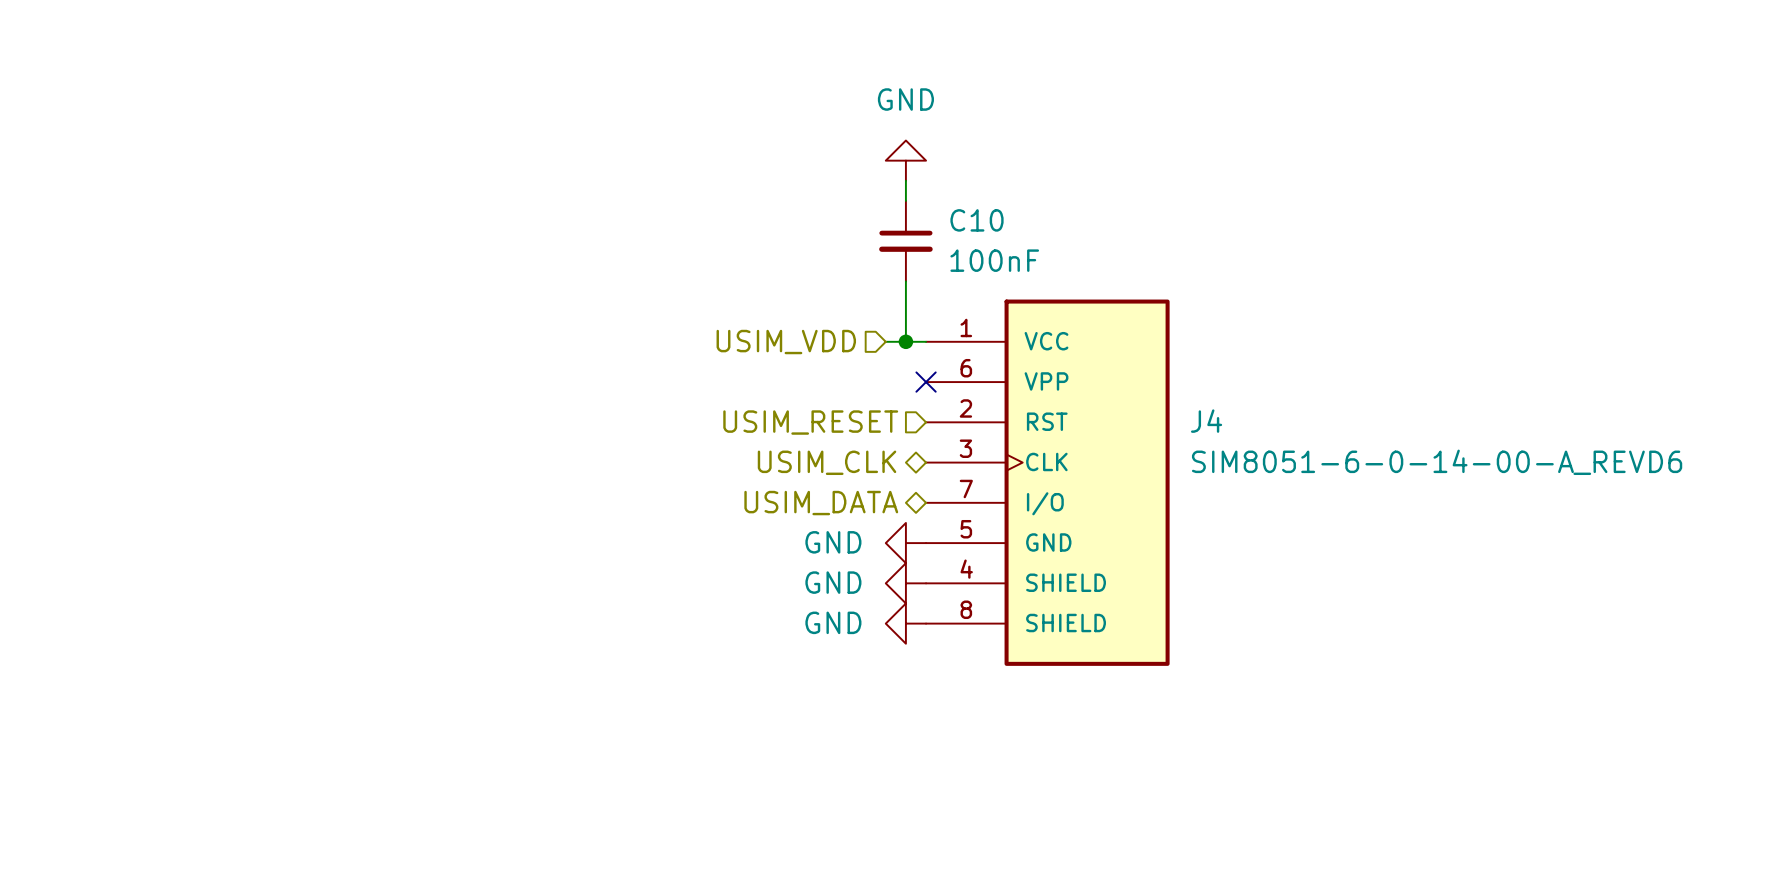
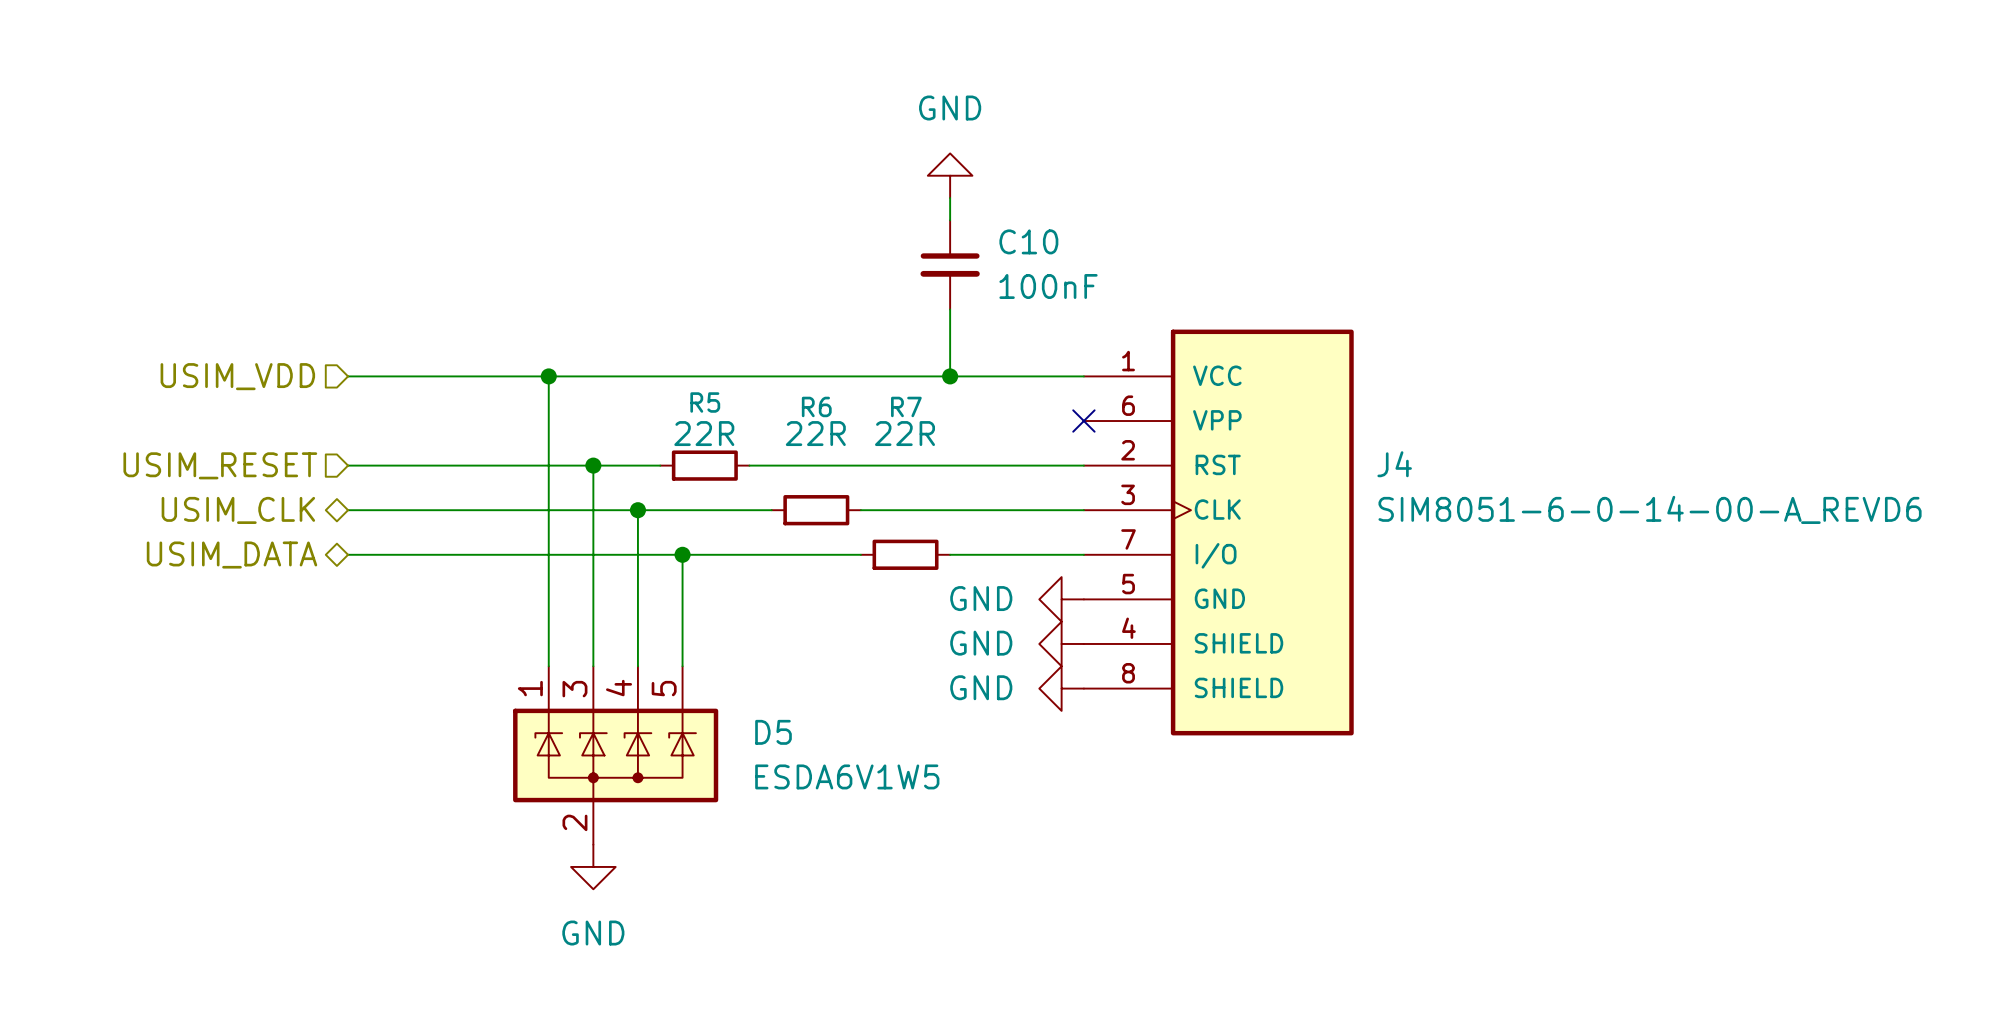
power symbol position: GND (905, 160) -> GND (950, 175)
wire: (905, 180) (905, 200) -> (950, 198) (950, 220)
C10 position: (905, 241) -> (950, 264)
wire: (905, 281) (905, 341) -> (950, 309) (950, 376)
wire: none -> (348, 376) (1039, 376)
wire: none -> (548, 376) (548, 666)
junction: none -> (548, 376)
junction: none -> (950, 376)
junction: (905, 341) -> none
hierarchical label: none -> USIM_VDD (237, 376)
hierarchical label: USIM_VDD (786, 342) -> none
hierarchical label: none -> USIM_RESET (220, 465)
wire: none -> (348, 465) (660, 465)
wire: none -> (593, 465) (593, 666)
junction: none -> (593, 465)
R5: none -> 22R (704, 465)
wire: none -> (749, 465) (1083, 465)
hierarchical label: USIM_RESET (810, 422) -> none
hierarchical label: none -> USIM_CLK (238, 510)
wire: none -> (348, 510) (771, 510)
wire: none -> (637, 510) (637, 666)
junction: none -> (637, 510)
R6: none -> 22R (816, 510)
wire: none -> (860, 510) (1083, 510)
hierarchical label: USIM_CLK (827, 462) -> none
wire: none -> (348, 554) (860, 554)
wire: none -> (682, 554) (682, 666)
junction: none -> (682, 554)
R7: none -> 22R (905, 554)
wire: none -> (950, 554) (1083, 554)
hierarchical label: none -> USIM_DATA (232, 555)
hierarchical label: USIM_DATA (821, 503) -> none
D5: none -> ESDA6V1W5 (615, 755)
power symbol: none -> GND (593, 866)

